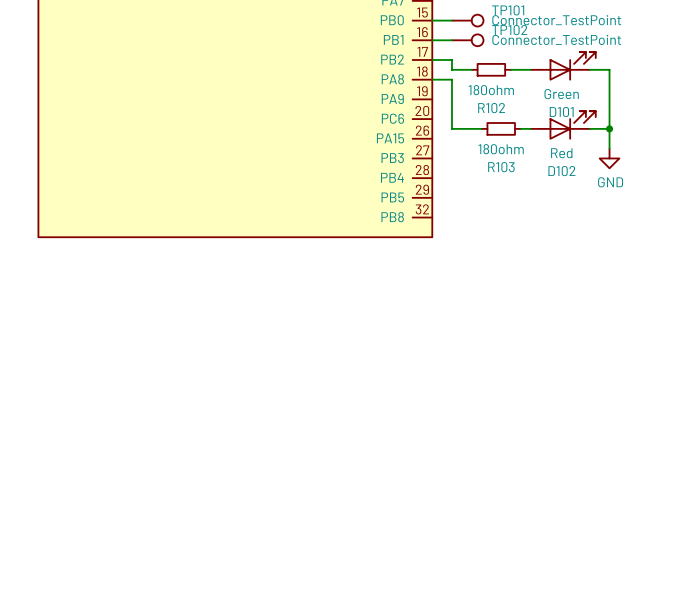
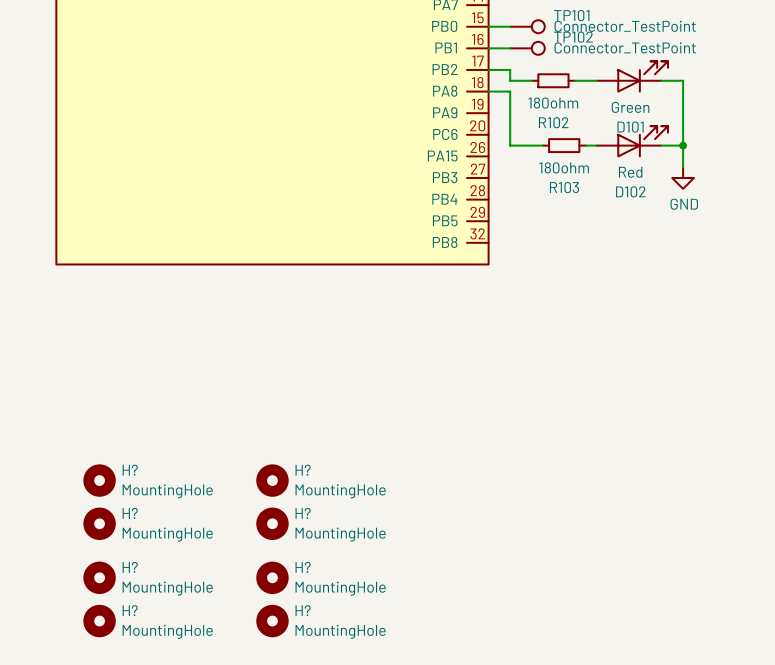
H?: none -> MountingHole (99, 480)
H?: none -> MountingHole (272, 480)
H?: none -> MountingHole (99, 523)
H?: none -> MountingHole (272, 523)
H?: none -> MountingHole (99, 577)
H?: none -> MountingHole (272, 577)
H?: none -> MountingHole (99, 621)
H?: none -> MountingHole (272, 621)

